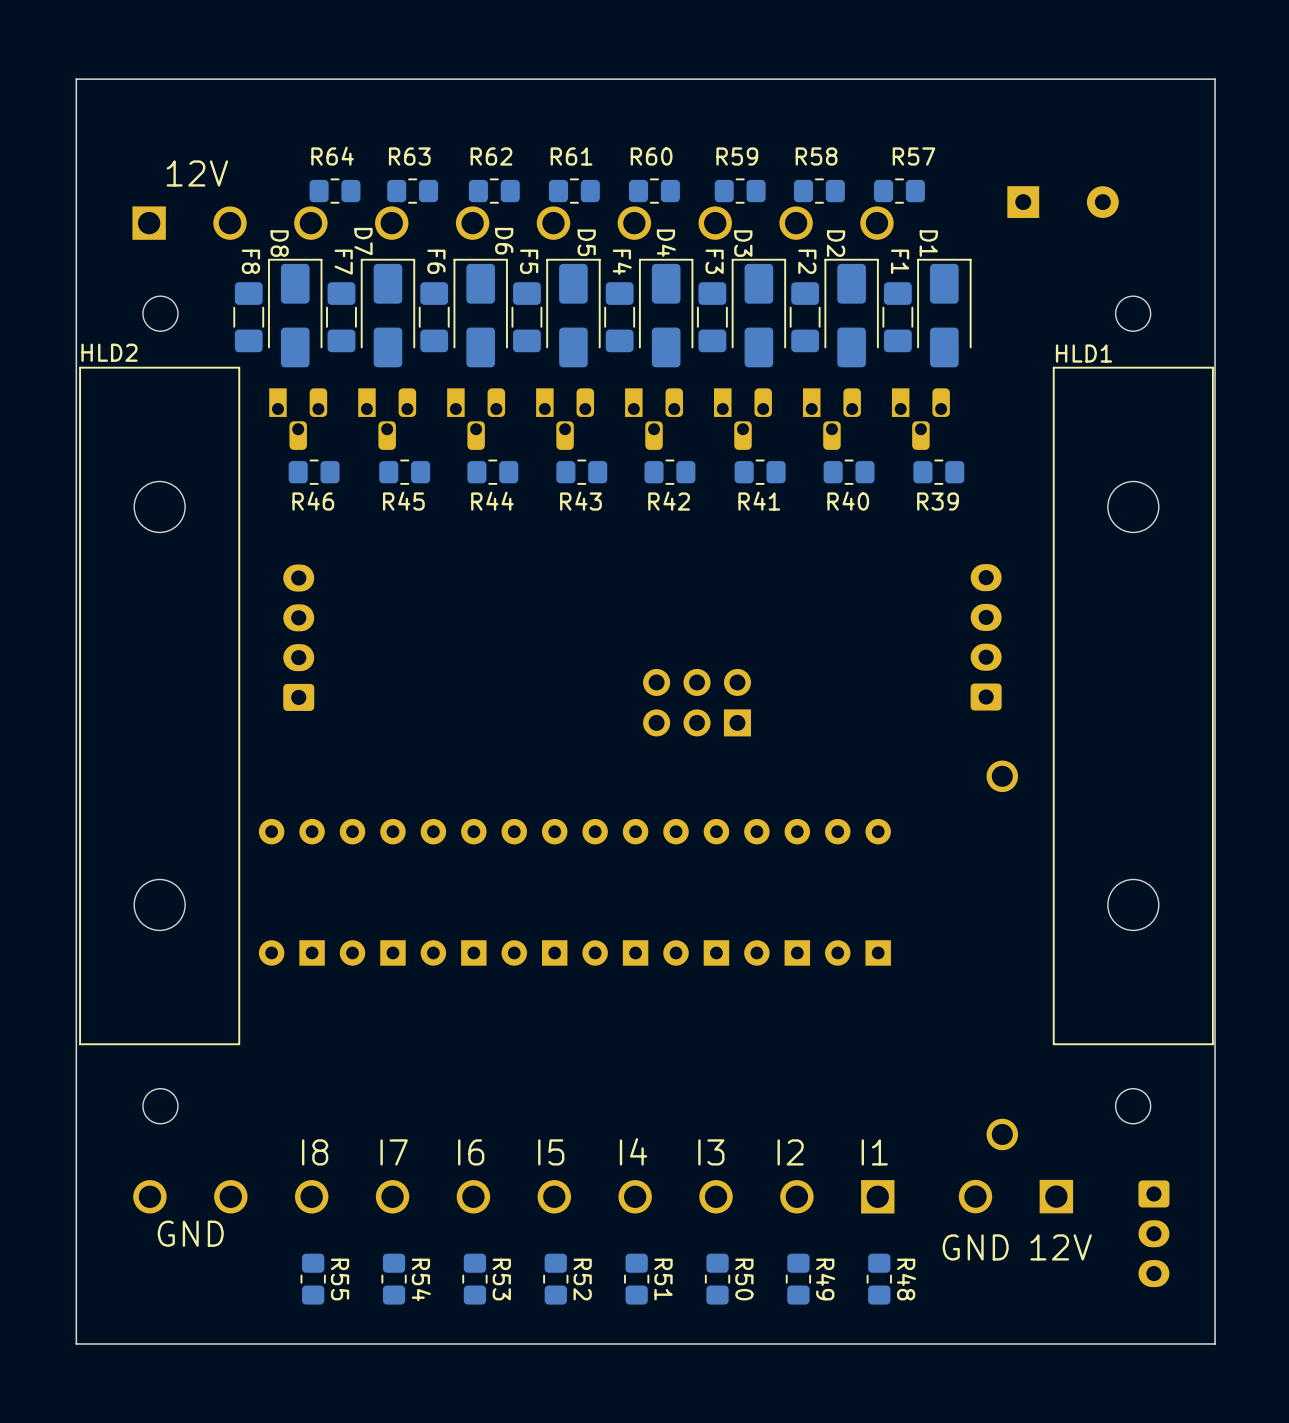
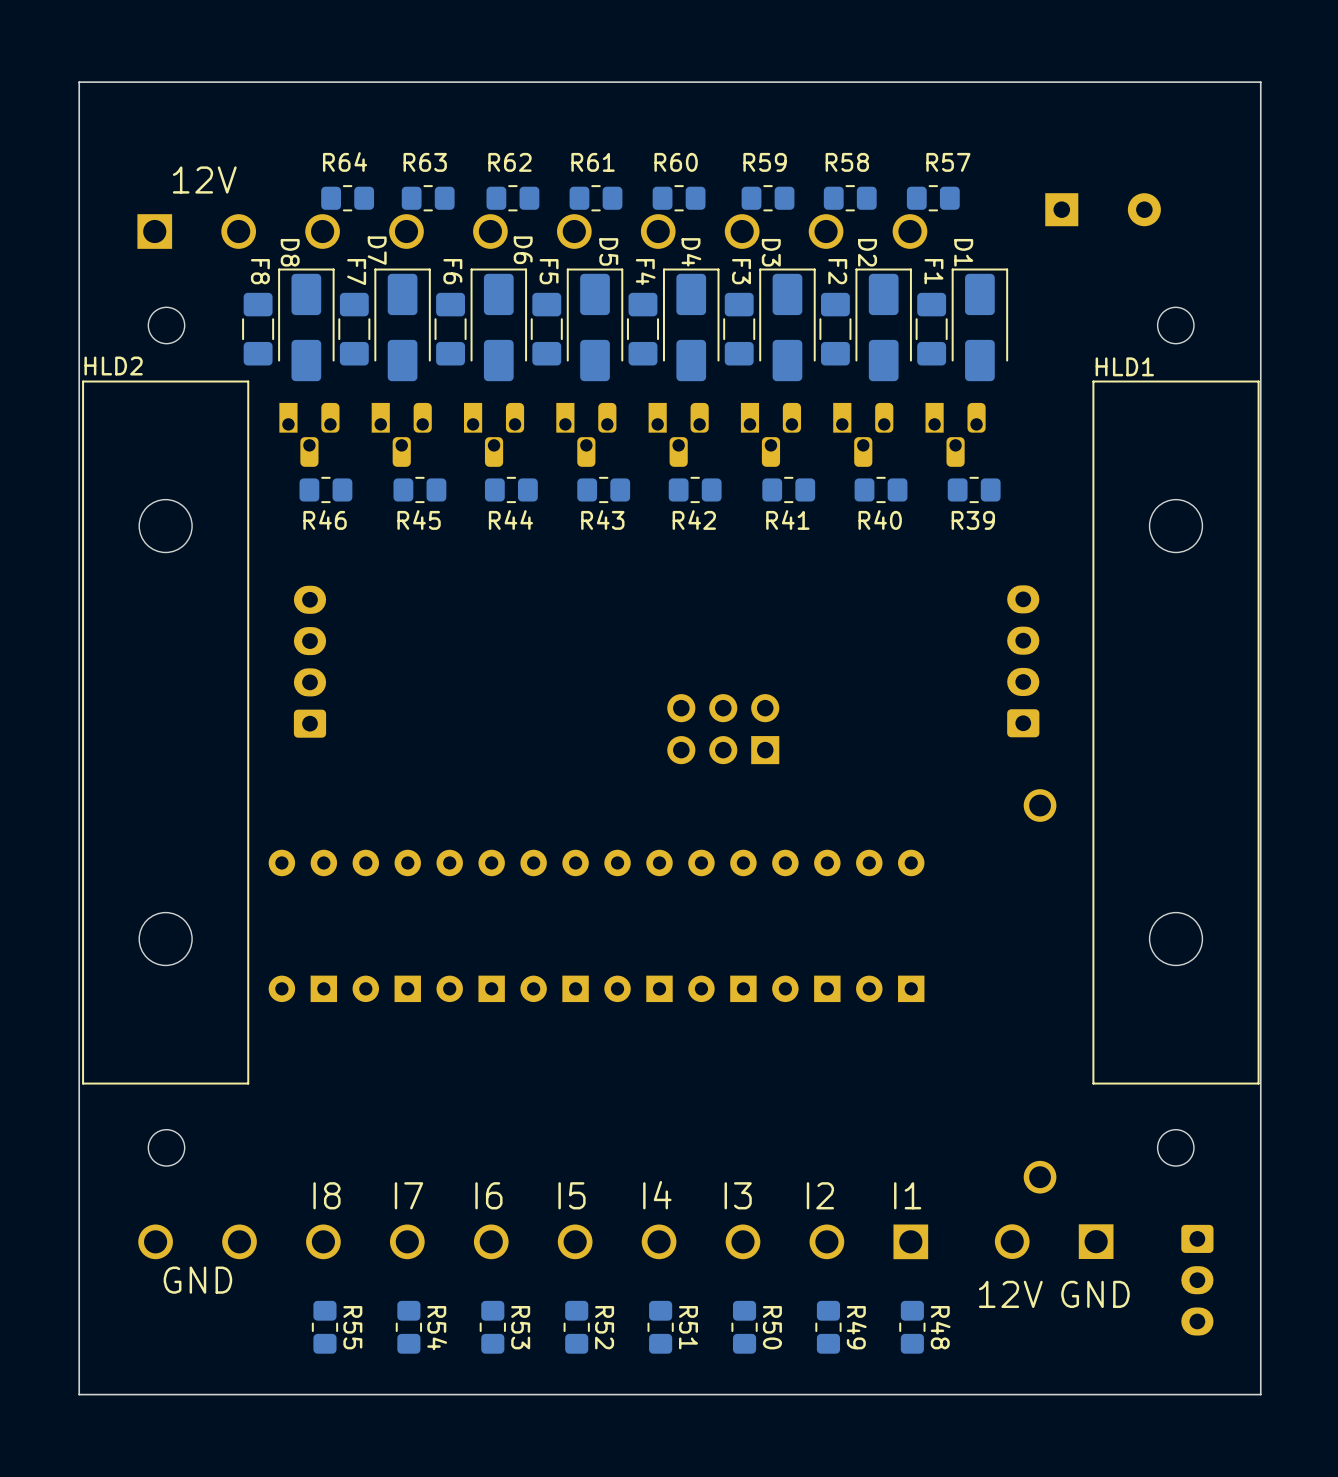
text: GND (975, 1247) -> 12V (1010, 1294)
text: 12V (1061, 1247) -> GND (1095, 1294)

